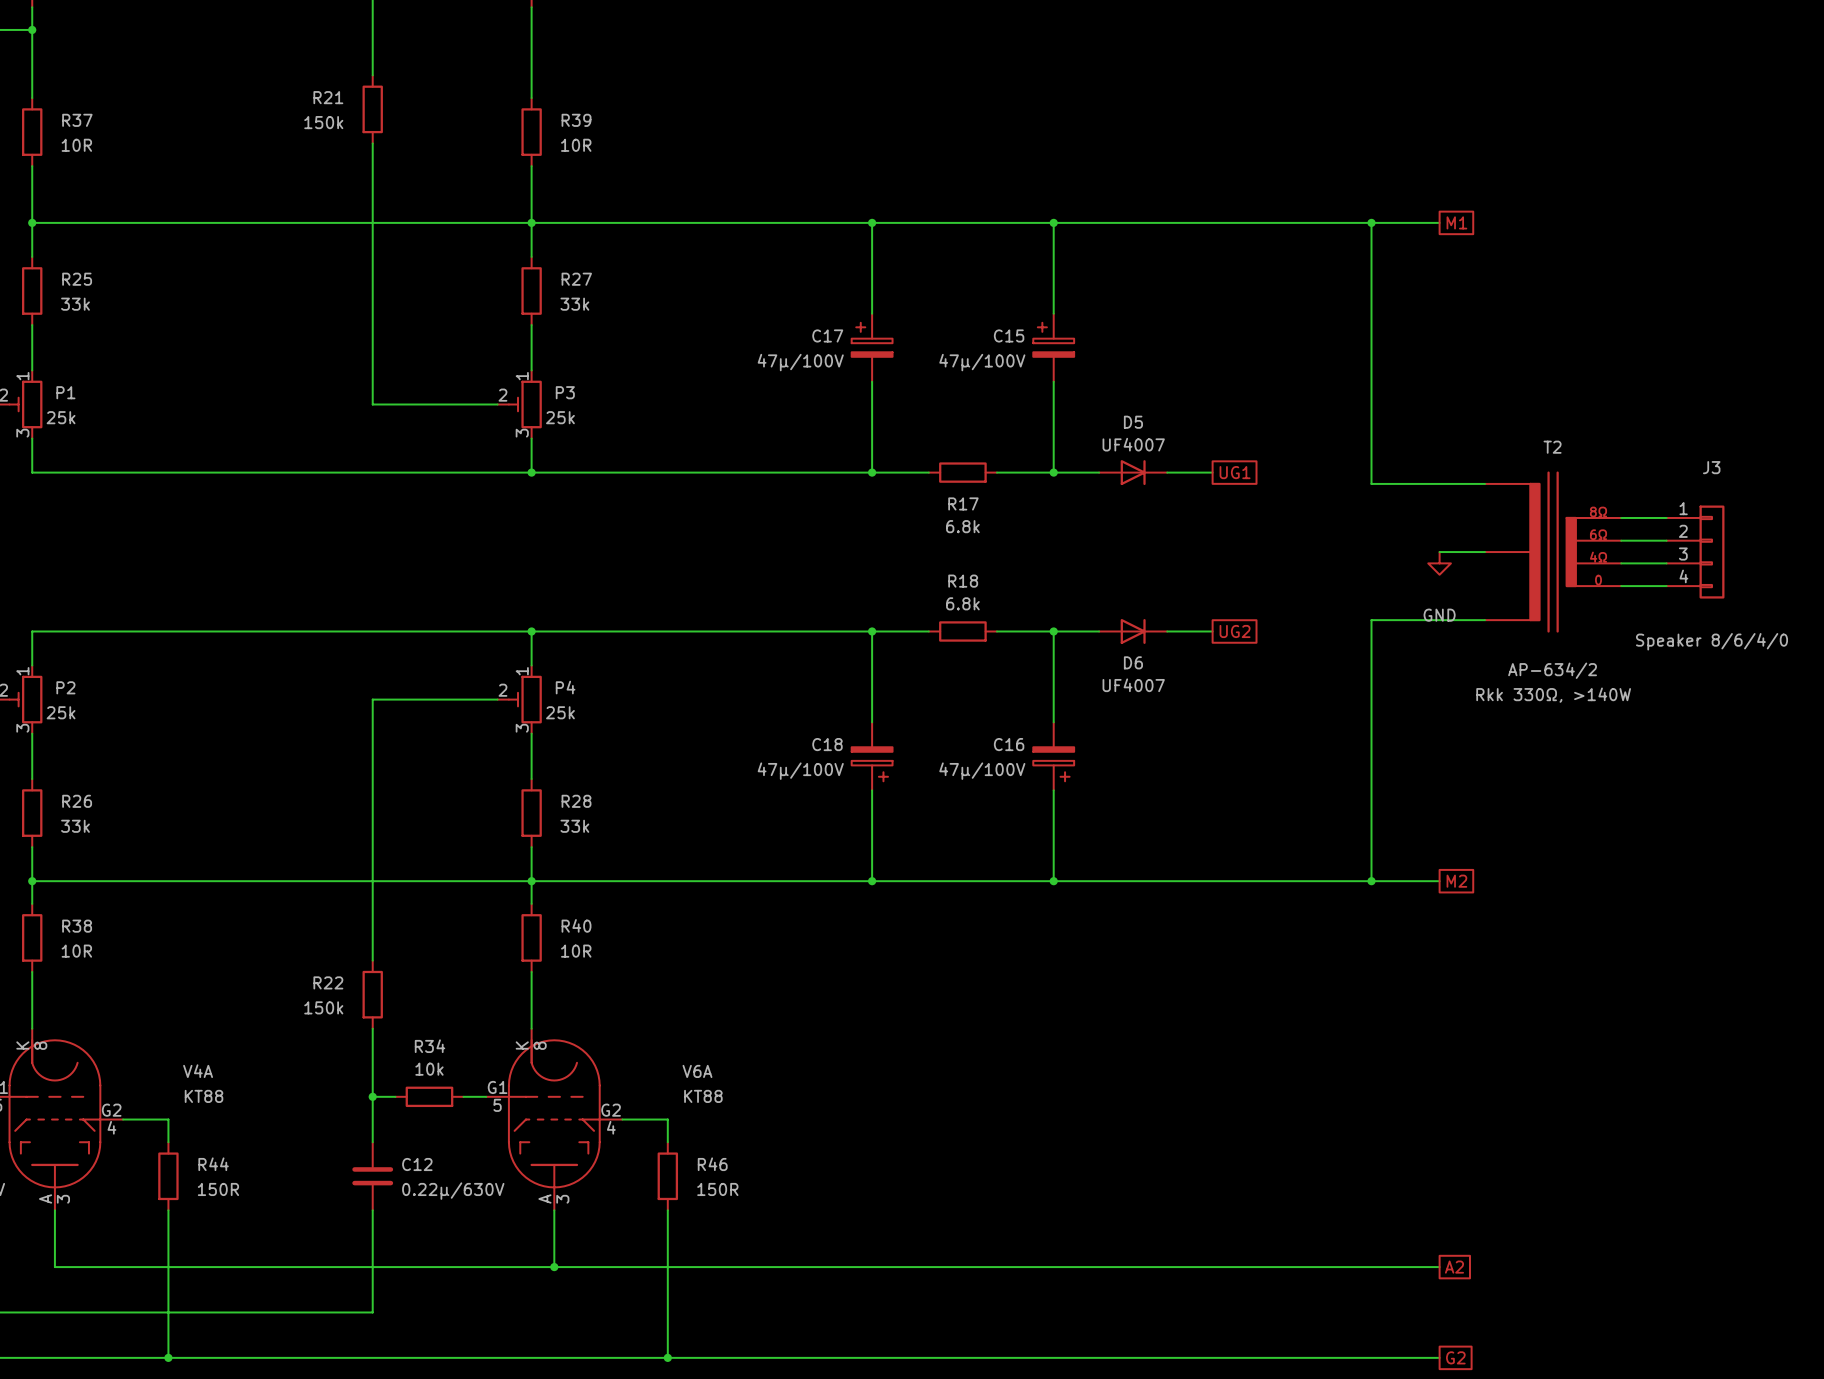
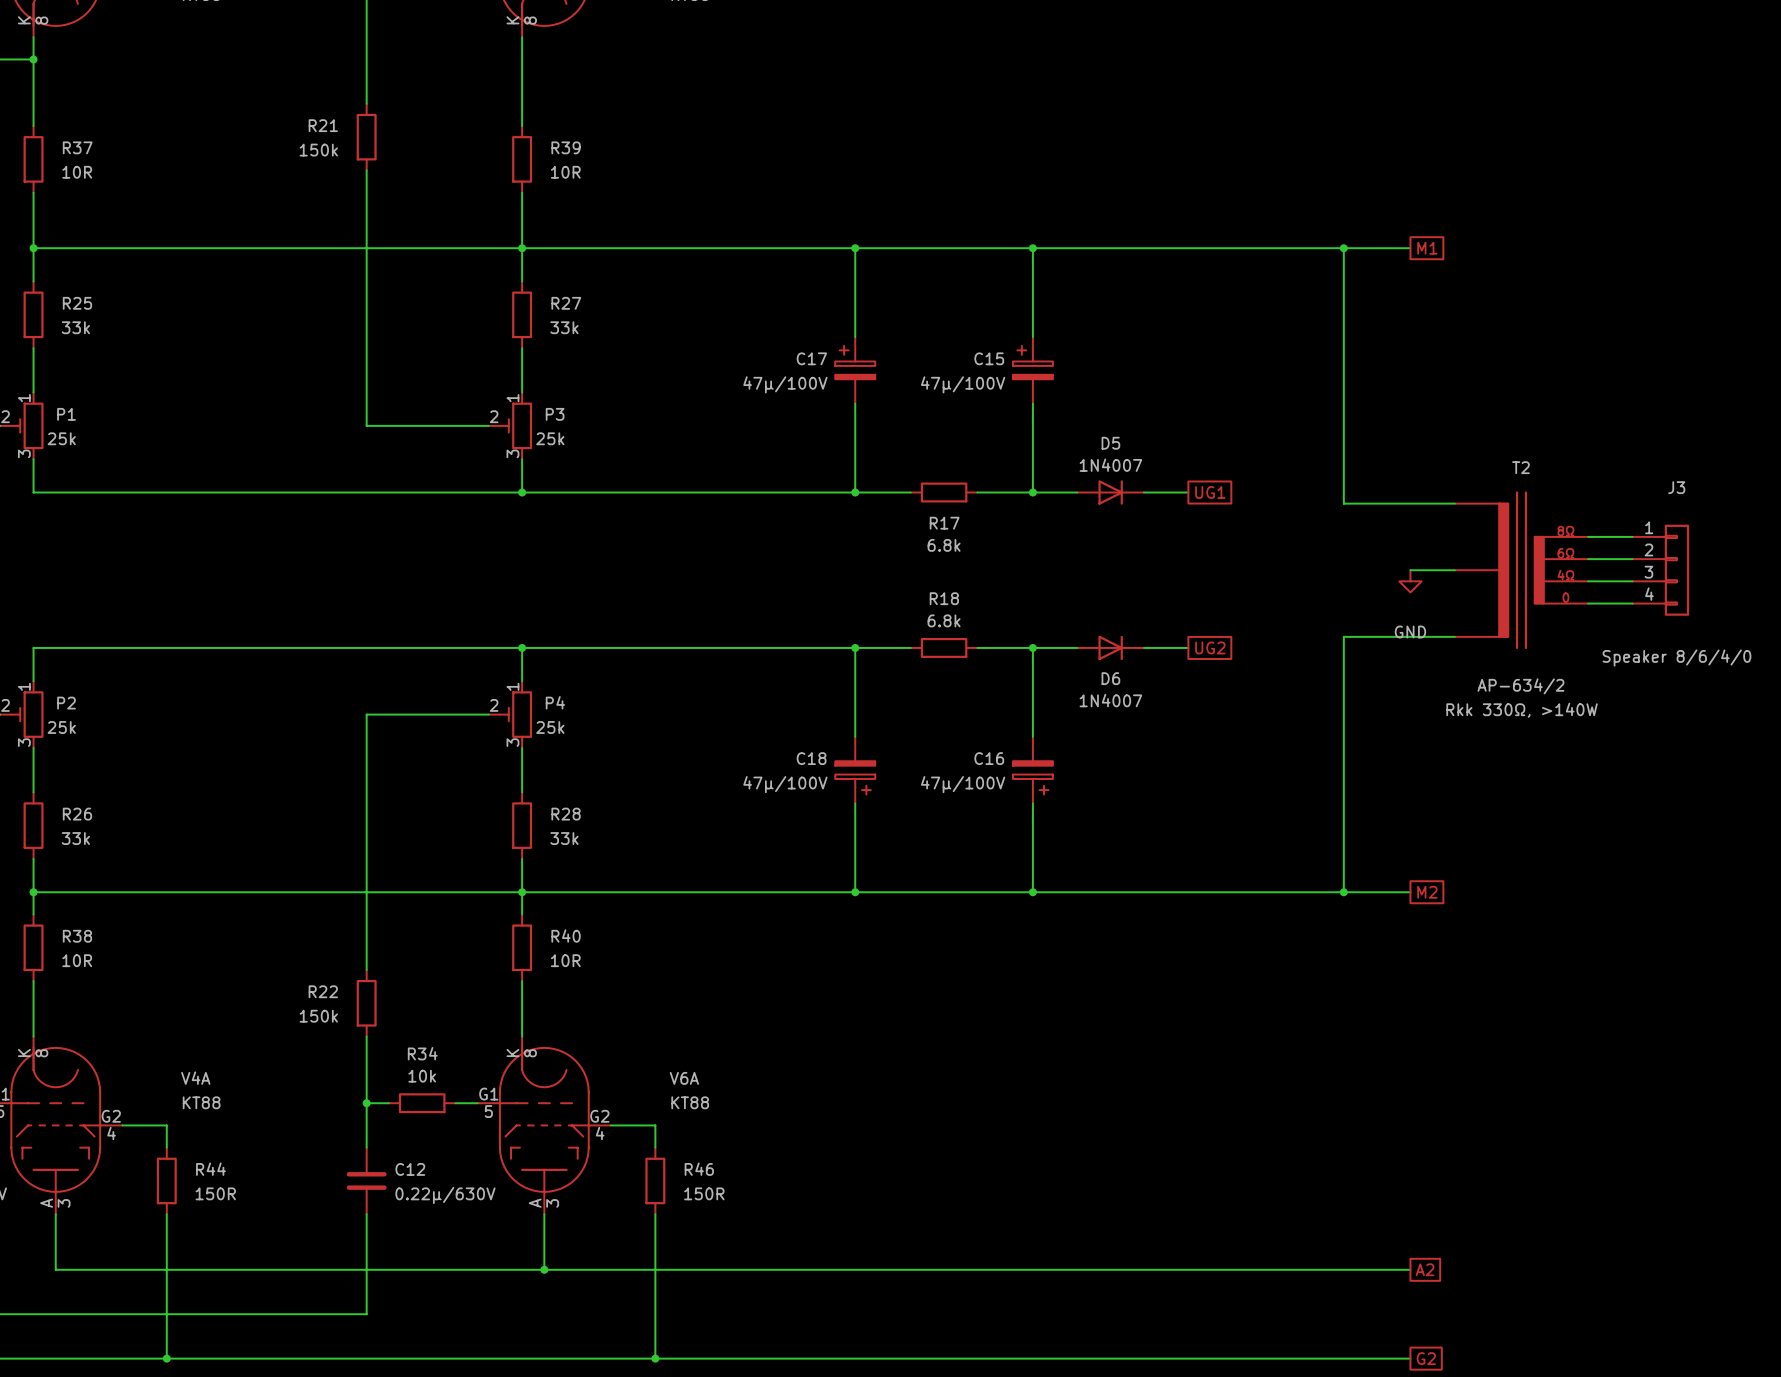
D5 value: UF4007 (1133, 444) -> 1N4007 (1110, 465)
D6 value: UF4007 (1133, 685) -> 1N4007 (1110, 700)

